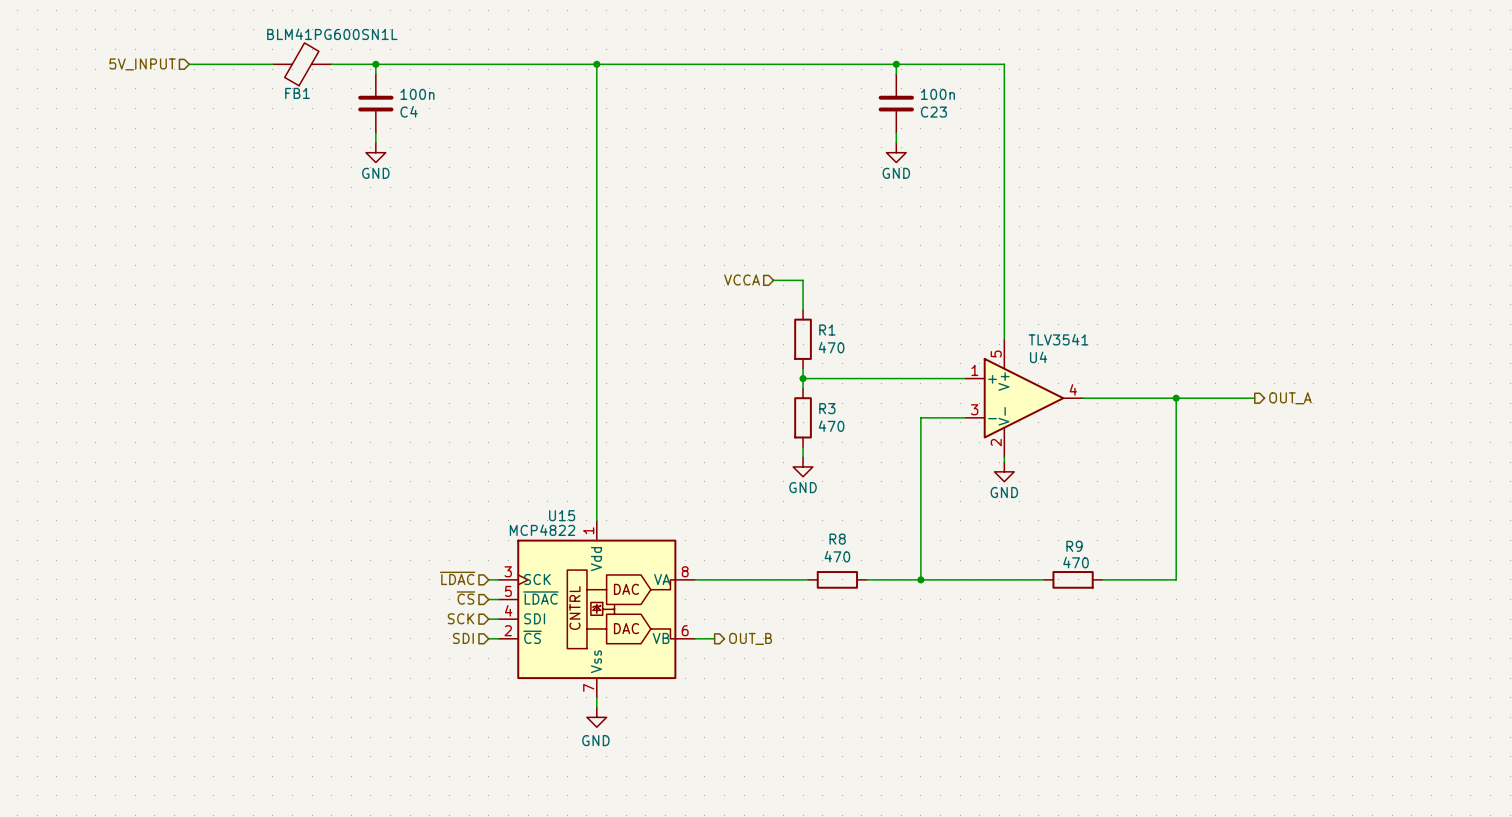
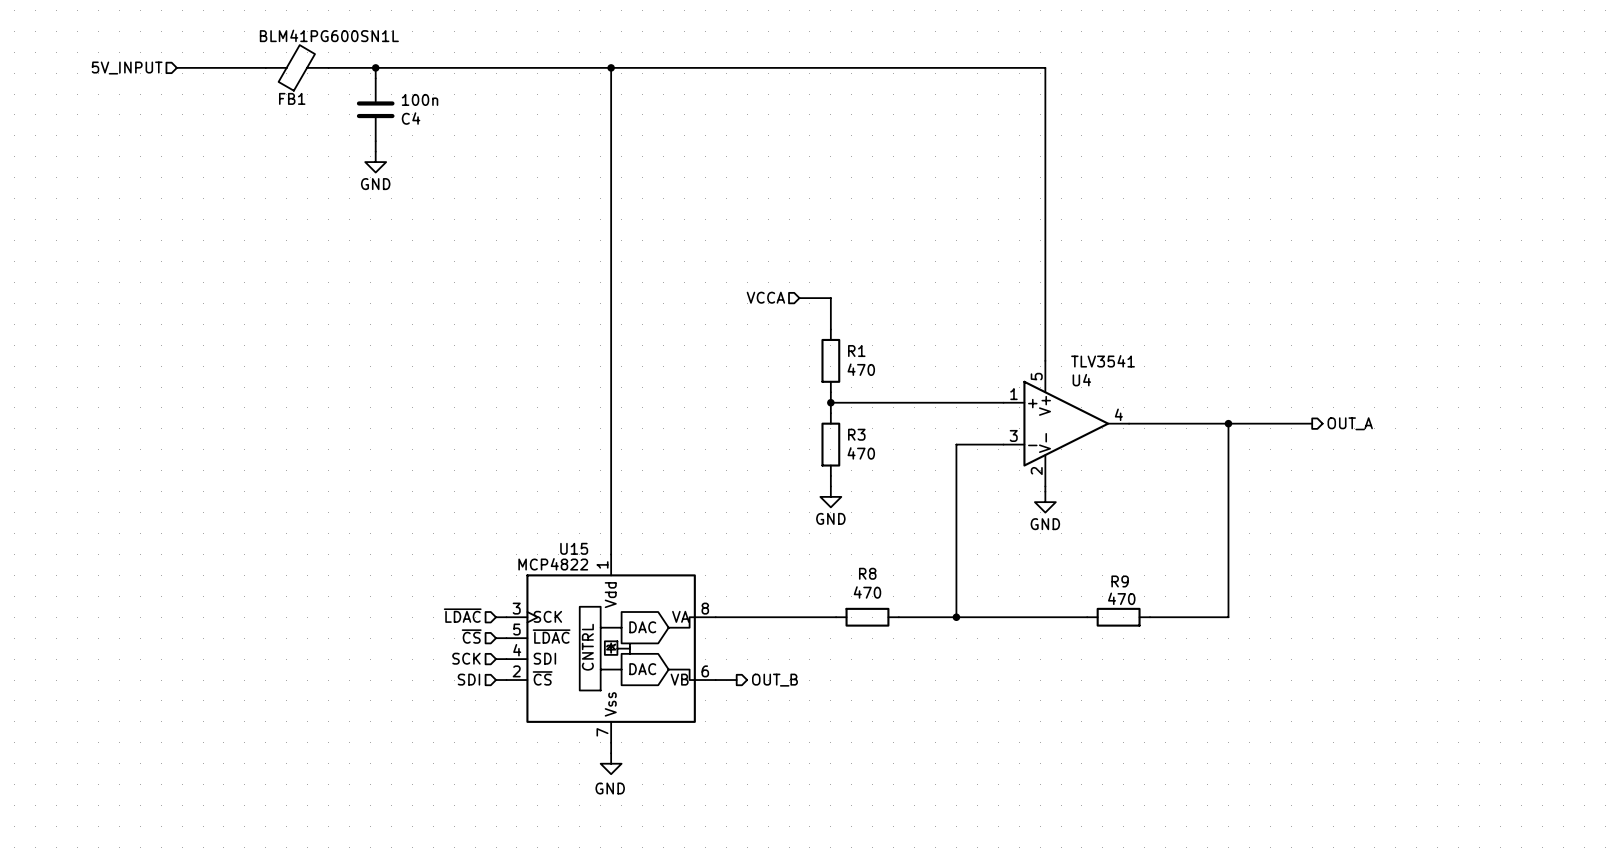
wire: (896, 64) (896, 74) -> none
junction: (896, 64) -> none
C23: 100n (896, 103) -> none
wire: (896, 133) (896, 142) -> none
power symbol: GND (896, 152) -> none

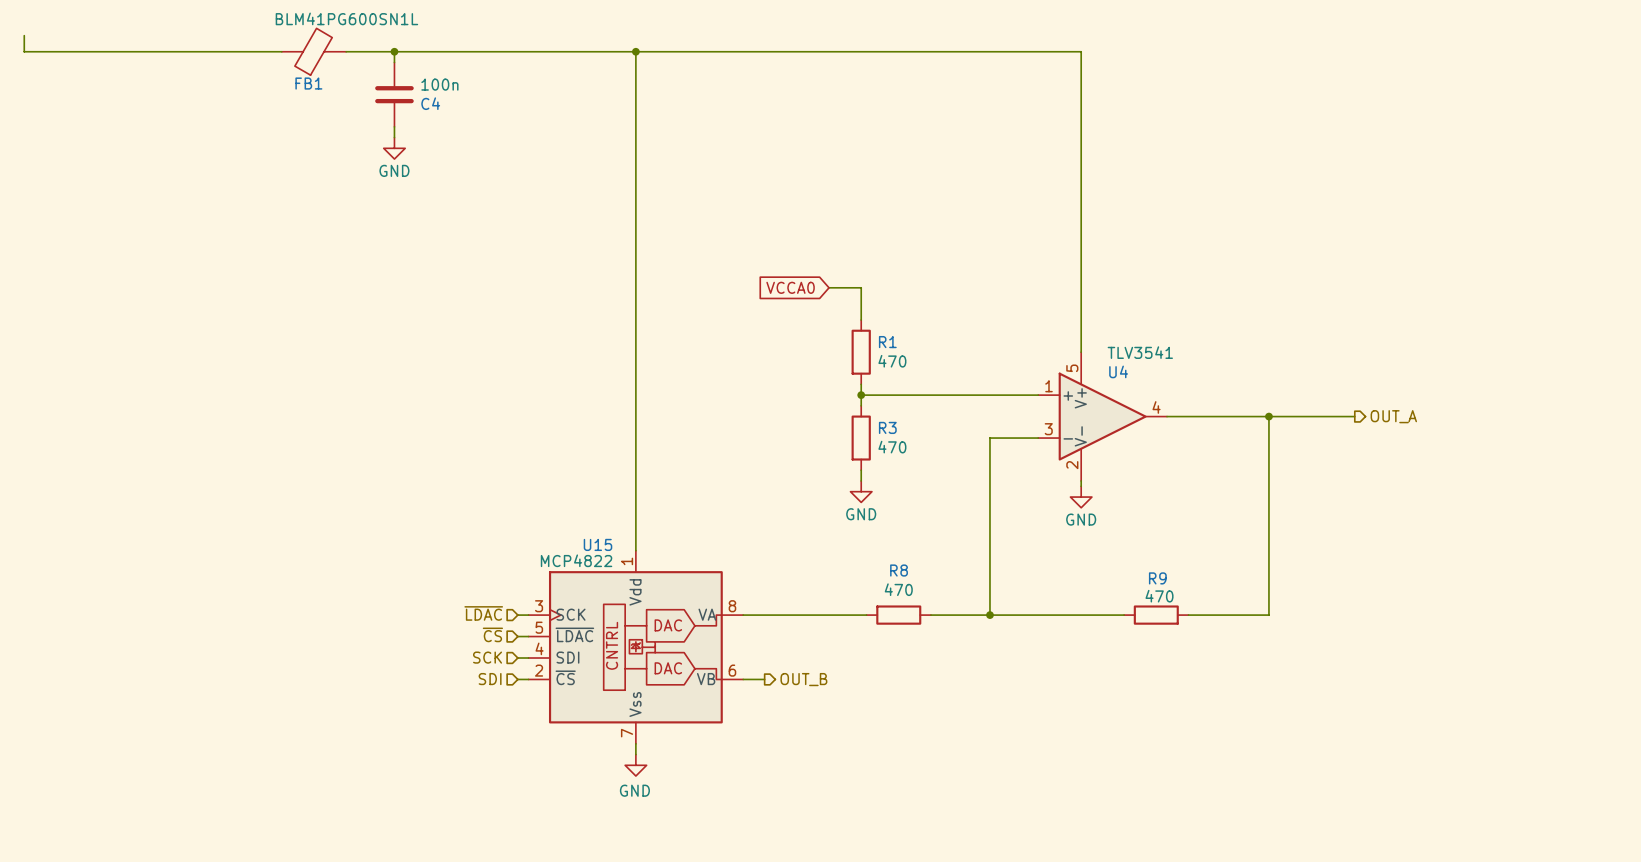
wire: none -> (24, 35) (24, 51) (190, 51)
hierarchical label: 5V_INPUT (127, 68) -> none
hierarchical label: VCCA (765, 297) -> none
global label: none -> VCCA0 (790, 287)

